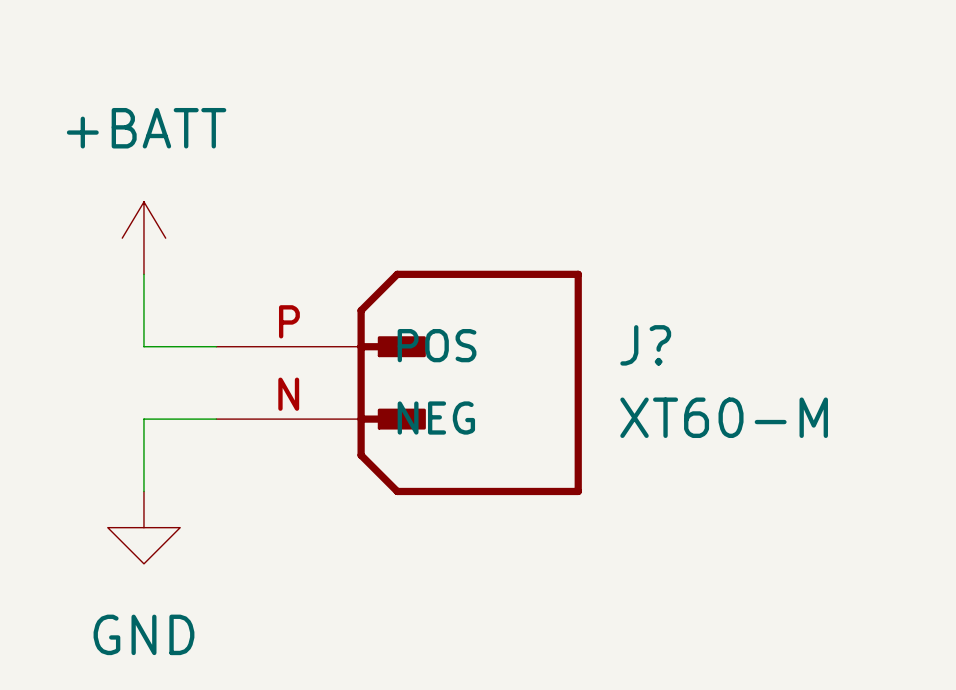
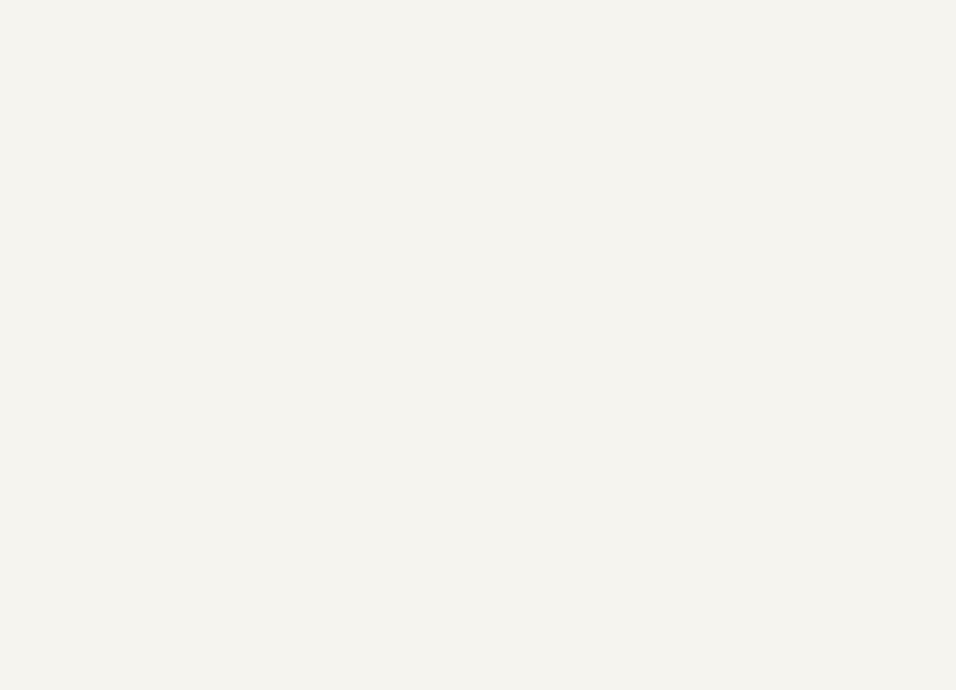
power symbol: +BATT (143, 238) -> none
wire: (143, 274) (143, 346) (216, 346) -> none
J?: XT60-M (399, 382) -> none
wire: (216, 419) (143, 419) (143, 491) -> none
power symbol: GND (143, 527) -> none

